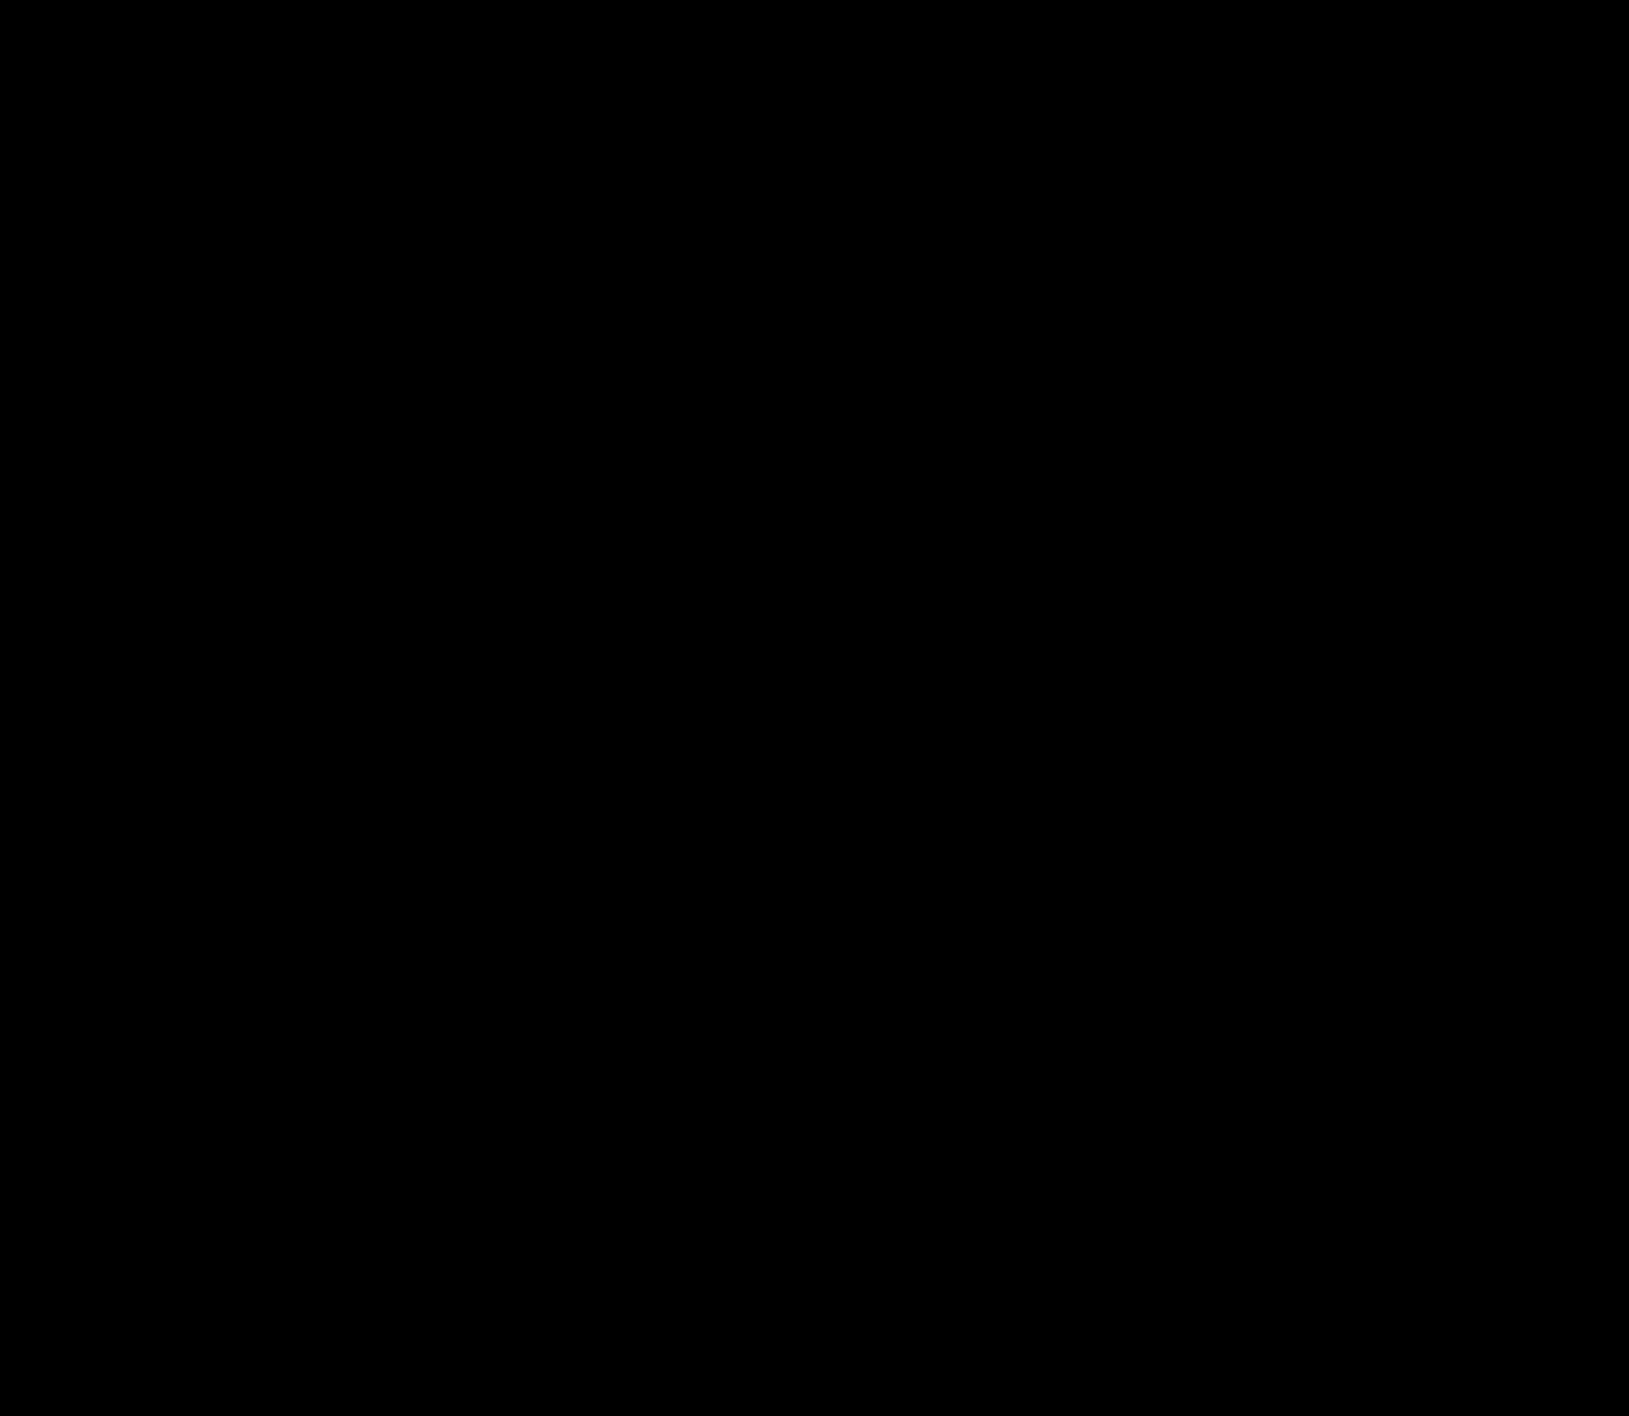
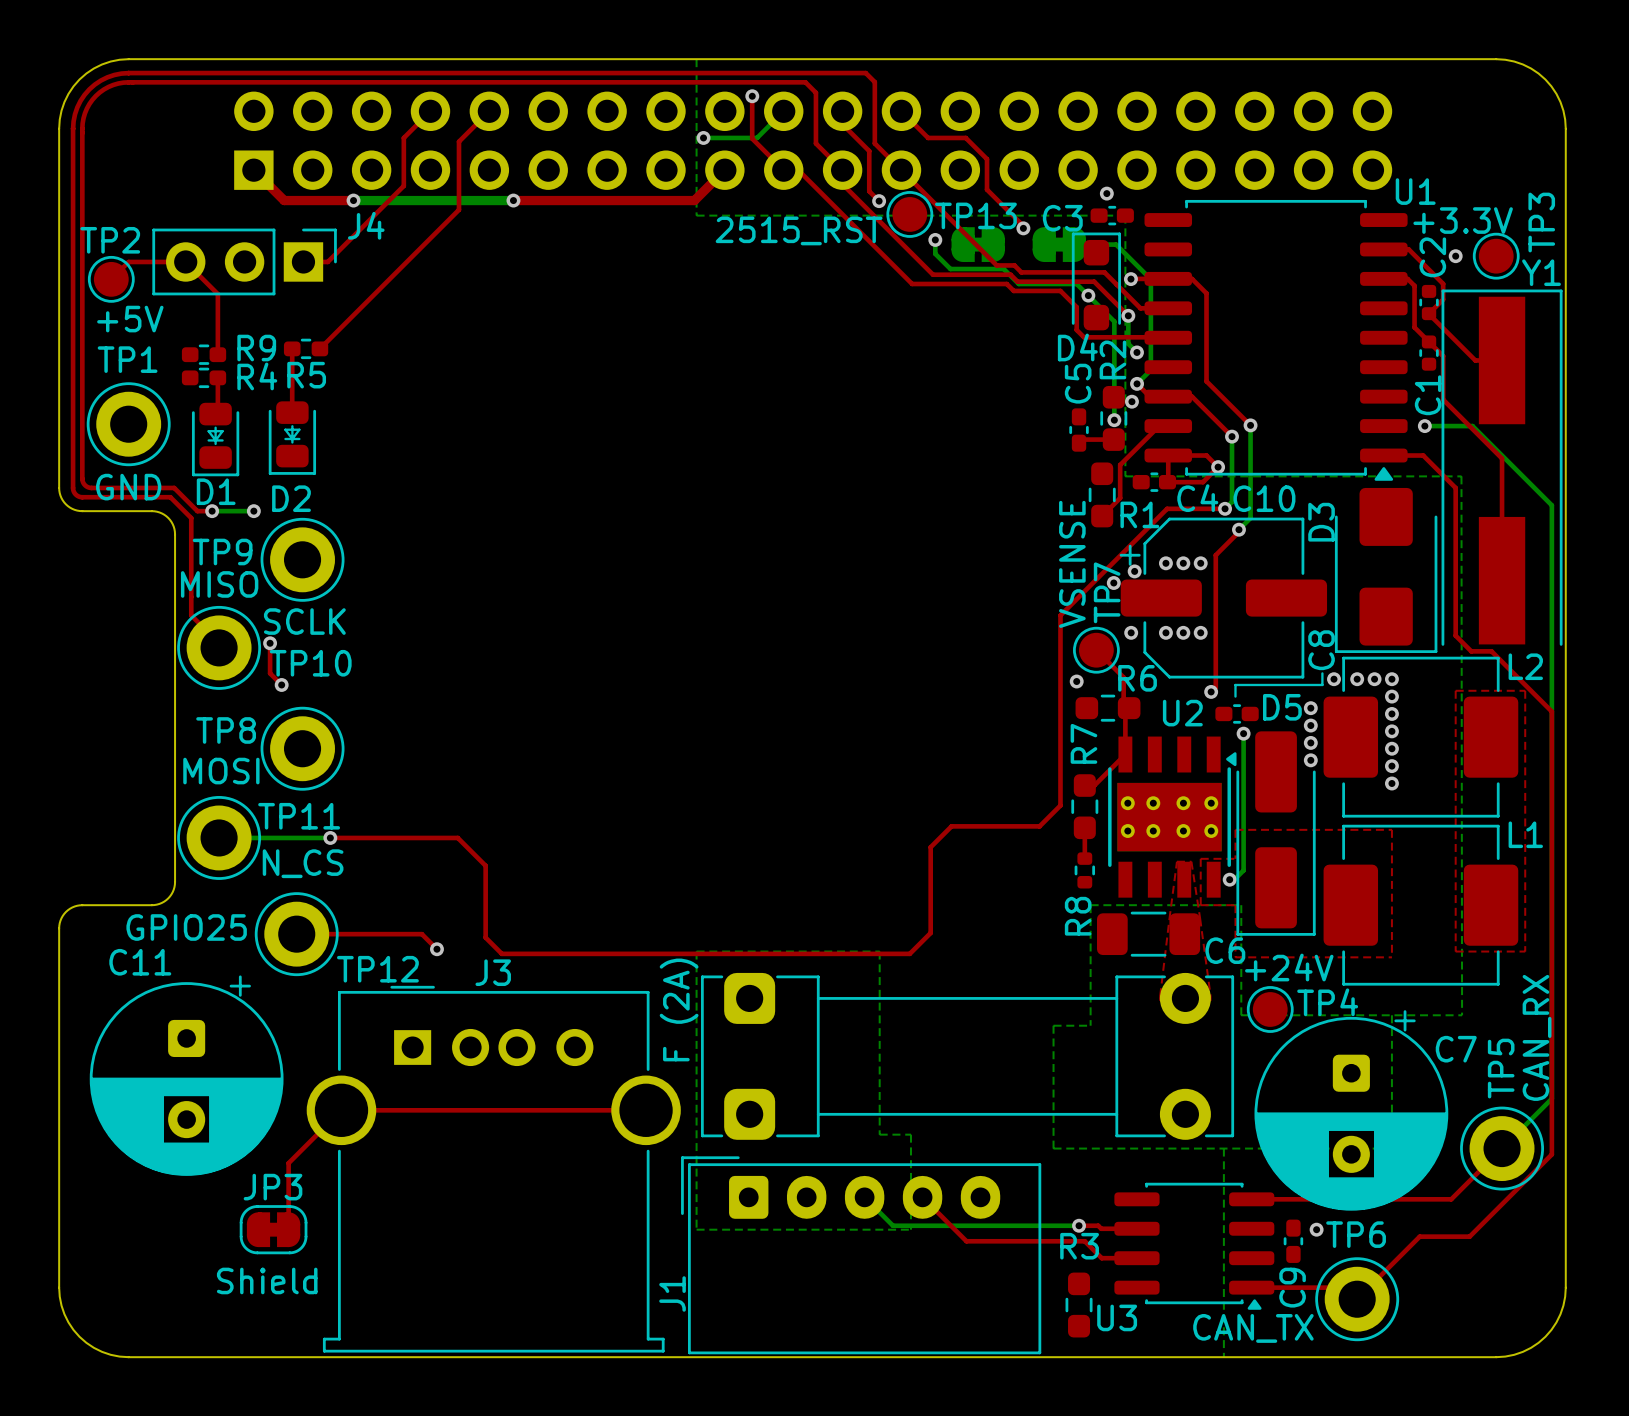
board edge: none -> (128, 59) (1496, 59) (1522, 64) (1545, 79) (1560, 102) (1565, 128) (1565, 1287) (1560, 1314) (1545, 1336) (1522, 1351) (1496, 1357) (128, 1357) (102, 1351) (79, 1336) (64, 1314) (59, 1287) (59, 923) (65, 911) (77, 905) (159, 903) (171, 894) (175, 882) (173, 526) (166, 516) (154, 511) (74, 509) (64, 502) (59, 490) (59, 119) (68, 93) (79, 79) (102, 64) (128, 59)
bottom zone outline: none -> (696, 59) (696, 215) (1125, 215) (1125, 476) (1461, 476) (1462, 1015) (1241, 1015) (1241, 905) (1090, 905) (1090, 1025) (1053, 1025) (1053, 1148) (1391, 1148) (1391, 1015)
top track: none -> (128, 82) (108, 86) (95, 95) (84, 113) (82, 128)
top track: none -> (128, 82) (805, 82) (815, 92) (815, 143) (842, 170) (842, 184) (933, 274) (1010, 274) (1017, 281) (1094, 281) (1128, 315)
top track: none -> (752, 96) (752, 138) (783, 170) (798, 170) (912, 283) (1006, 283) (1013, 290) (1060, 290) (1076, 307) (1076, 330) (1084, 337) (1168, 337)
via: none -> (752, 96)
top track: none -> (430, 111) (403, 137) (403, 185) (327, 261) (303, 261)
top track: none -> (489, 111) (458, 141) (458, 209) (319, 348)
bottom track: none -> (783, 111) (757, 137) (703, 137)
top track: none -> (842, 111) (842, 124) (869, 151) (869, 191) (879, 201)
top track: none -> (901, 111) (928, 137) (965, 137) (987, 159) (987, 189) (1023, 226) (1023, 228)
top track: none -> (82, 128) (82, 481) (90, 487) (174, 487) (197, 511) (212, 511)
via: none -> (703, 137)
part: none -> (813, 140)
top track: none -> (253, 170) (284, 200) (353, 200)
top track: none -> (724, 170) (694, 200) (513, 200)
via: none -> (1106, 193)
bottom track: none -> (353, 200) (513, 200)
via: none -> (353, 200)
via: none -> (513, 200)
via: none -> (879, 201)
TP13: none -> (909, 214)
C3: none -> (1112, 215)
via: none -> (1023, 228)
bottom track: none -> (935, 239) (935, 253) (950, 269) (1003, 269) (1018, 283) (1076, 283) (1114, 321) (1114, 420)
via: none -> (935, 239)
part: none -> (978, 244)
part: none -> (1059, 244)
bottom track: none -> (1074, 244) (1116, 244) (1150, 279) (1150, 370) (1137, 383) (1139, 383)
top track: none -> (1383, 249) (1408, 249) (1443, 283) (1443, 299) (1429, 313)
via: none -> (1455, 256)
TP3: none -> (1496, 256)
J4: none -> (244, 261)
top track: none -> (1131, 278) (1192, 278) (1206, 293) (1206, 381) (1250, 425)
top track: none -> (1383, 278) (1407, 278) (1414, 285) (1414, 327) (1443, 356) (1443, 399) (1502, 458) (1502, 580)
top track: none -> (111, 279) (128, 261) (185, 261) (217, 294) (217, 354)
TP2: none -> (111, 279)
via: none -> (1130, 279)
D4: none -> (1096, 281)
via: none -> (1088, 295)
C2: none -> (1429, 302)
top track: none -> (1168, 308) (1140, 308) (1104, 272) (1021, 272) (1014, 265) (996, 265) (874, 143) (874, 82) (865, 73) (128, 73) (107, 77) (94, 84) (84, 94) (77, 107) (73, 121) (73, 490) (75, 494) (81, 497) (170, 497) (191, 518) (191, 615) (219, 643) (219, 647)
top track: none -> (1429, 314) (1475, 360) (1502, 360)
bottom track: none -> (1128, 315) (1128, 343) (1136, 352)
via: none -> (1128, 315)
U1: none -> (1276, 340)
top track: none -> (292, 348) (292, 412)
R5: none -> (306, 348)
via: none -> (1136, 352)
C1: none -> (1429, 353)
R9: none -> (204, 354)
R4: none -> (204, 377)
top track: none -> (217, 377) (217, 411) (215, 414)
top track: none -> (1137, 383) (1149, 396) (1192, 396) (1232, 436)
via: none -> (1137, 383)
via: none -> (1131, 401)
R2: none -> (1113, 418)
via: none -> (1114, 420)
TP1: none -> (128, 424)
bottom track: none -> (1250, 425) (1250, 518) (1238, 529)
via: none -> (1250, 425)
top track: none -> (1168, 426) (1159, 426) (1120, 465) (1120, 498) (1102, 516)
bottom track: none -> (1424, 426) (1472, 426) (1551, 505) (1551, 1098) (1502, 1148)
via: none -> (1424, 426)
C5: none -> (1079, 430)
bottom track: none -> (1232, 436) (1232, 501) (1225, 508)
via: none -> (1232, 436)
top track: none -> (1111, 437) (1113, 439) (1082, 439) (1079, 443)
D2: none -> (292, 438)
D1: none -> (215, 439)
top track: none -> (1168, 455) (1167, 482) (1203, 482) (1218, 467) (1206, 455) (1168, 455)
top track: none -> (1383, 455) (1423, 455) (1455, 487) (1455, 635) (1471, 651) (1491, 651) (1551, 711) (1551, 1154) (1469, 1236) (1419, 1236) (1357, 1299) (1345, 1287) (1251, 1287)
via: none -> (1218, 467)
Y1: none -> (1502, 467)
C4: none -> (1154, 482)
R1: none -> (1102, 494)
top track: none -> (1225, 508) (1167, 508) (1060, 615) (1060, 805) (1039, 826) (951, 826) (930, 847) (930, 933) (909, 953) (501, 953) (485, 937) (485, 865) (457, 837) (330, 837)
via: none -> (1225, 508)
bottom track: none -> (212, 511) (253, 511)
via: none -> (212, 511)
via: none -> (253, 511)
top track: none -> (1238, 529) (1238, 532) (1215, 555) (1215, 687) (1211, 691)
via: none -> (1238, 529)
TP9: none -> (302, 559)
via: none -> (1165, 563)
via: none -> (1183, 563)
via: none -> (1200, 563)
D3: none -> (1386, 570)
via: none -> (1134, 571)
via: none -> (1113, 583)
C10: none -> (1223, 598)
via: none -> (1131, 632)
via: none -> (1165, 632)
via: none -> (1183, 632)
via: none -> (1200, 632)
top track: none -> (270, 643) (270, 673) (281, 684)
via: none -> (270, 643)
TP10: none -> (219, 647)
top track: none -> (1096, 650) (1123, 677) (1123, 702) (1129, 708) (1125, 711) (1125, 754) (1094, 785) (1084, 785)
TP7: none -> (1096, 650)
line: none -> (1322, 673) (1322, 684) (1235, 684) (1235, 696)
via: none -> (1333, 679)
via: none -> (1357, 679)
via: none -> (1374, 679)
via: none -> (1391, 679)
via: none -> (1076, 681)
via: none -> (281, 684)
top zone outline: none -> (1455, 690) (1525, 690) (1525, 951) (1455, 951) (1455, 690)
via: none -> (1211, 691)
via: none -> (1391, 696)
R6: none -> (1108, 708)
via: none -> (1310, 708)
C8: none -> (1237, 713)
via: none -> (1391, 713)
via: none -> (1310, 725)
via: none -> (1391, 731)
bottom track: none -> (1243, 733) (1243, 870) (1234, 879) (1229, 879)
via: none -> (1243, 733)
L2: none -> (1420, 737)
via: none -> (1310, 742)
TP8: none -> (302, 748)
via: none -> (1391, 748)
via: none -> (1310, 760)
via: none -> (1391, 766)
via: none -> (1391, 783)
R7: none -> (1084, 806)
U2: none -> (1172, 817)
top track: none -> (1084, 827) (1084, 858)
top zone outline: none -> (1235, 829) (1235, 858) (1200, 858) (1200, 905) (1235, 905) (1235, 957) (1391, 957) (1391, 829) (1235, 829)
D5: none -> (1276, 833)
bottom track: none -> (219, 837) (330, 837)
TP11: none -> (219, 837)
via: none -> (330, 837)
top zone outline: none -> (1176, 861) (1191, 861) (1210, 1000) (1160, 1000) (1176, 861)
R8: none -> (1084, 870)
via: none -> (1229, 879)
L1: none -> (1420, 905)
top track: none -> (296, 934) (421, 934) (436, 949)
TP12: none -> (296, 934)
C6: none -> (1148, 934)
via: none -> (436, 949)
bottom zone outline: none -> (696, 951) (696, 1229) (910, 1229) (910, 1134) (879, 1134) (879, 951) (696, 951)
text: none -> F (2A) (679, 1009)
TP4: none -> (1270, 1009)
part: none -> (967, 1056)
C11: none -> (186, 1075)
top track: none -> (646, 1110) (341, 1110) (288, 1163) (288, 1229)
C7: none -> (1351, 1110)
bottom zone outline: none -> (1223, 1148) (1223, 1357)
top track: none -> (1502, 1148) (1451, 1199) (1251, 1199)
TP5: none -> (1502, 1148)
J3: none -> (493, 1169)
bottom track: none -> (864, 1197) (893, 1225) (1079, 1225)
top track: none -> (922, 1197) (966, 1241) (1084, 1241) (1101, 1258) (1136, 1258)
top track: none -> (1079, 1225) (1098, 1225) (1101, 1228) (1136, 1228)
via: none -> (1079, 1225)
JP3: none -> (273, 1229)
via: none -> (1316, 1229)
C9: none -> (1293, 1241)
U3: none -> (1194, 1246)
J1: none -> (861, 1255)
TP6: none -> (1357, 1299)
R3: none -> (1079, 1305)

